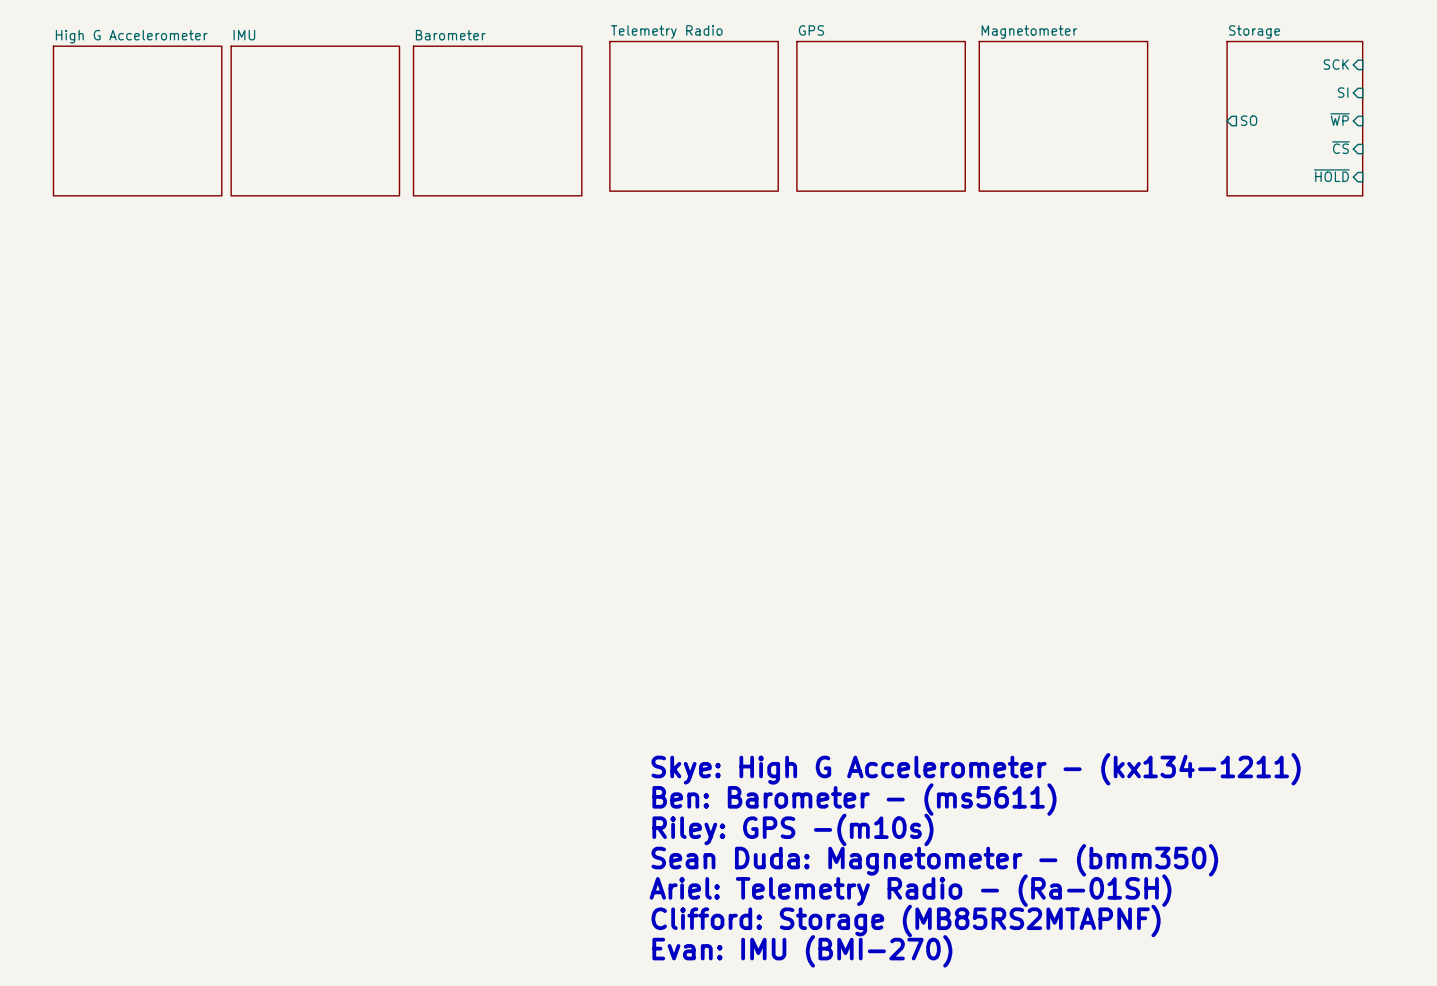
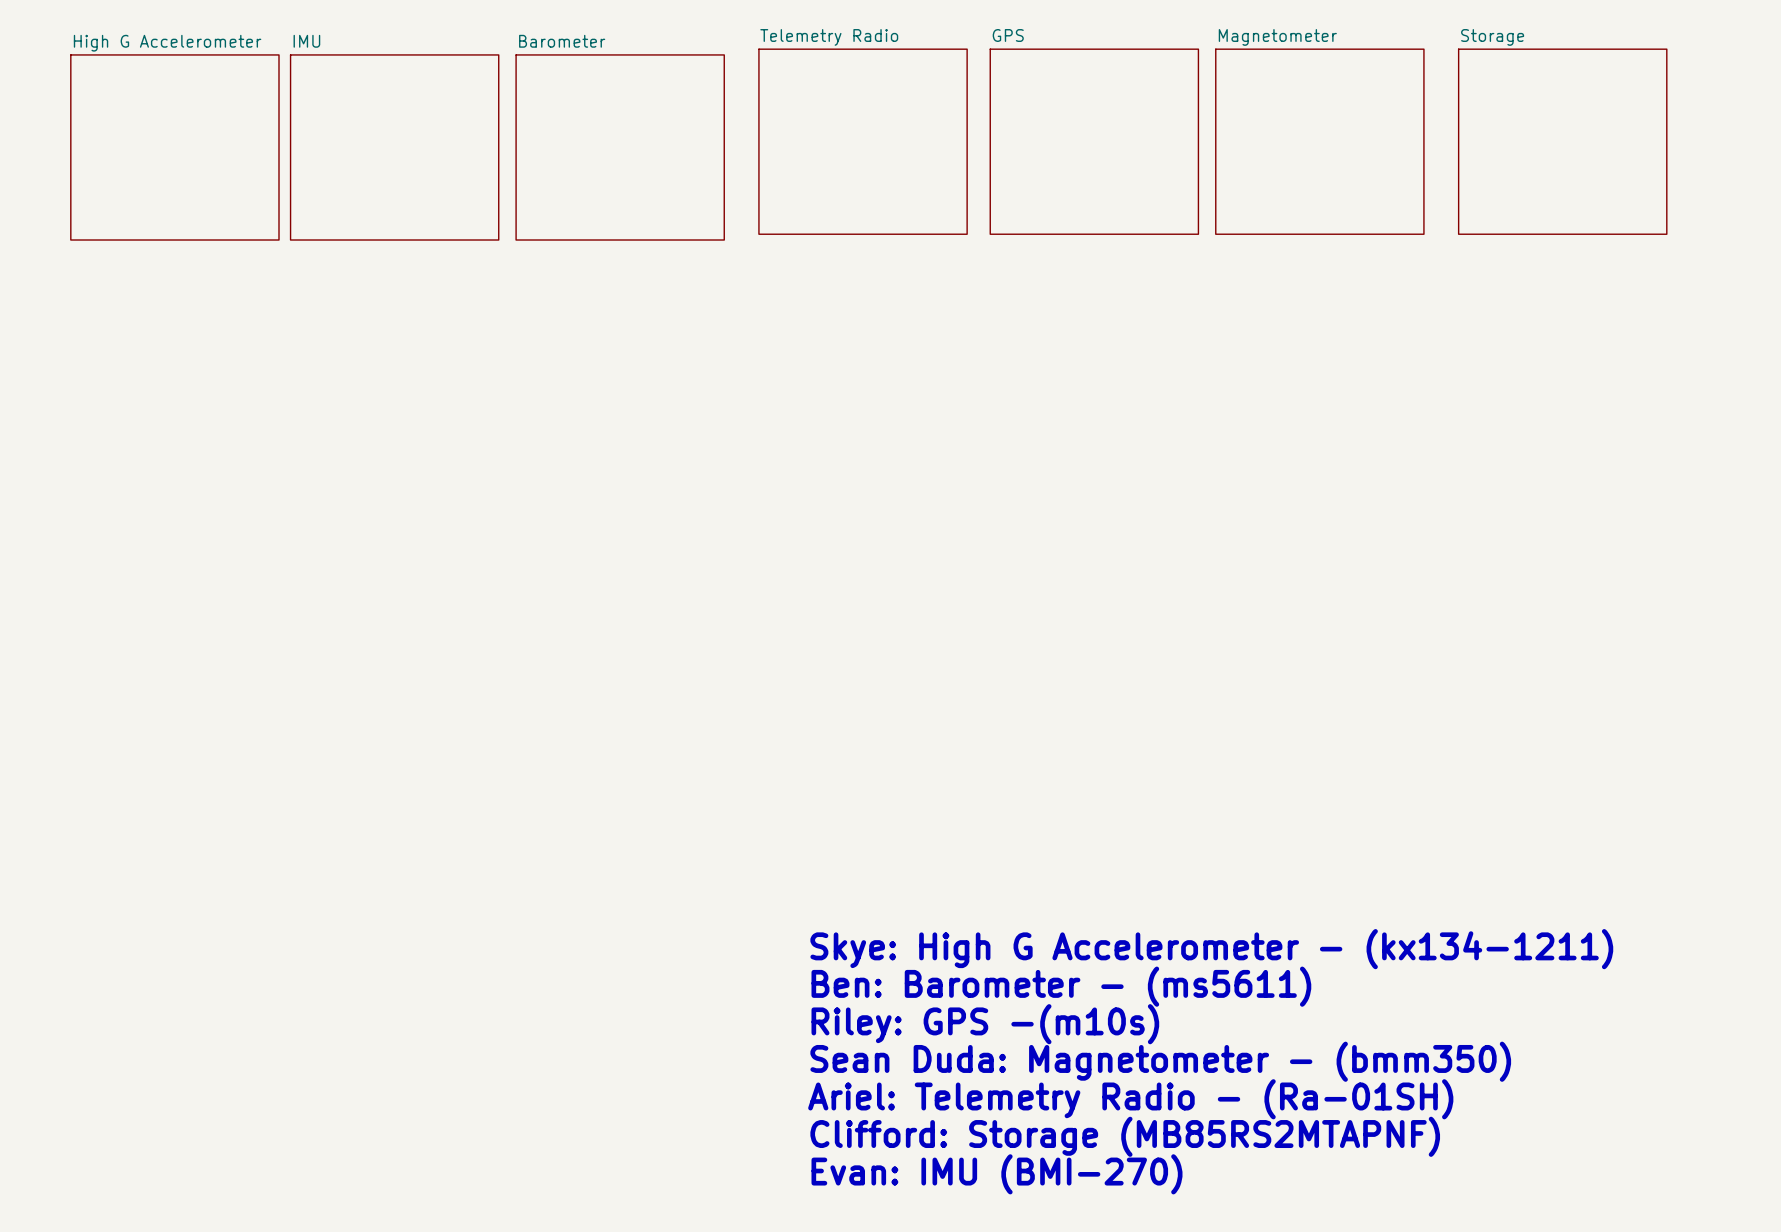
sheet pin: SCK (1336, 64) -> none
sheet pin: SI (1343, 92) -> none
sheet Storage: none -> (1562, 141)
sheet Storage: (1294, 118) -> none
sheet pin: ~{WP} (1340, 119) -> none
sheet pin: SO (1249, 120) -> none
sheet pin: ~{CS} (1340, 147) -> none
sheet pin: ~{HOLD} (1331, 175) -> none

